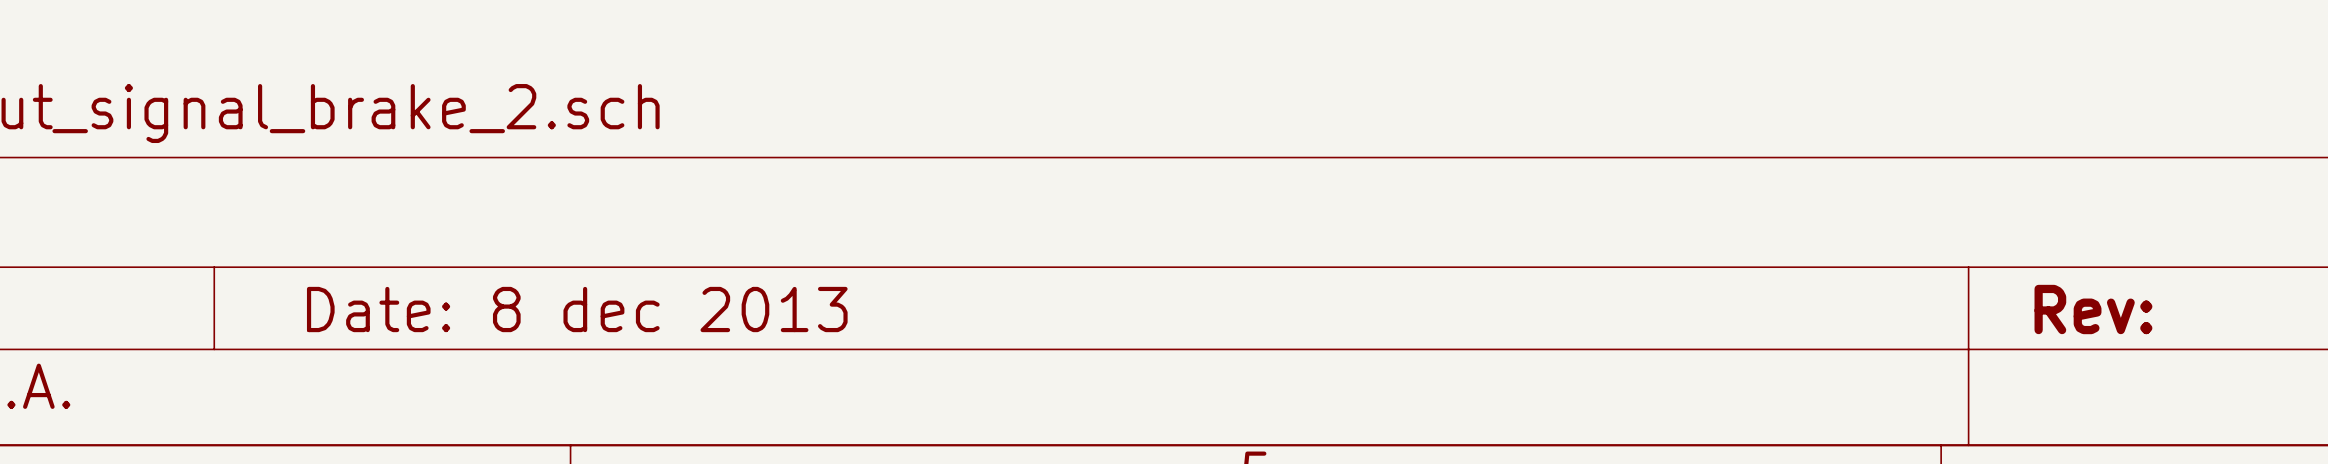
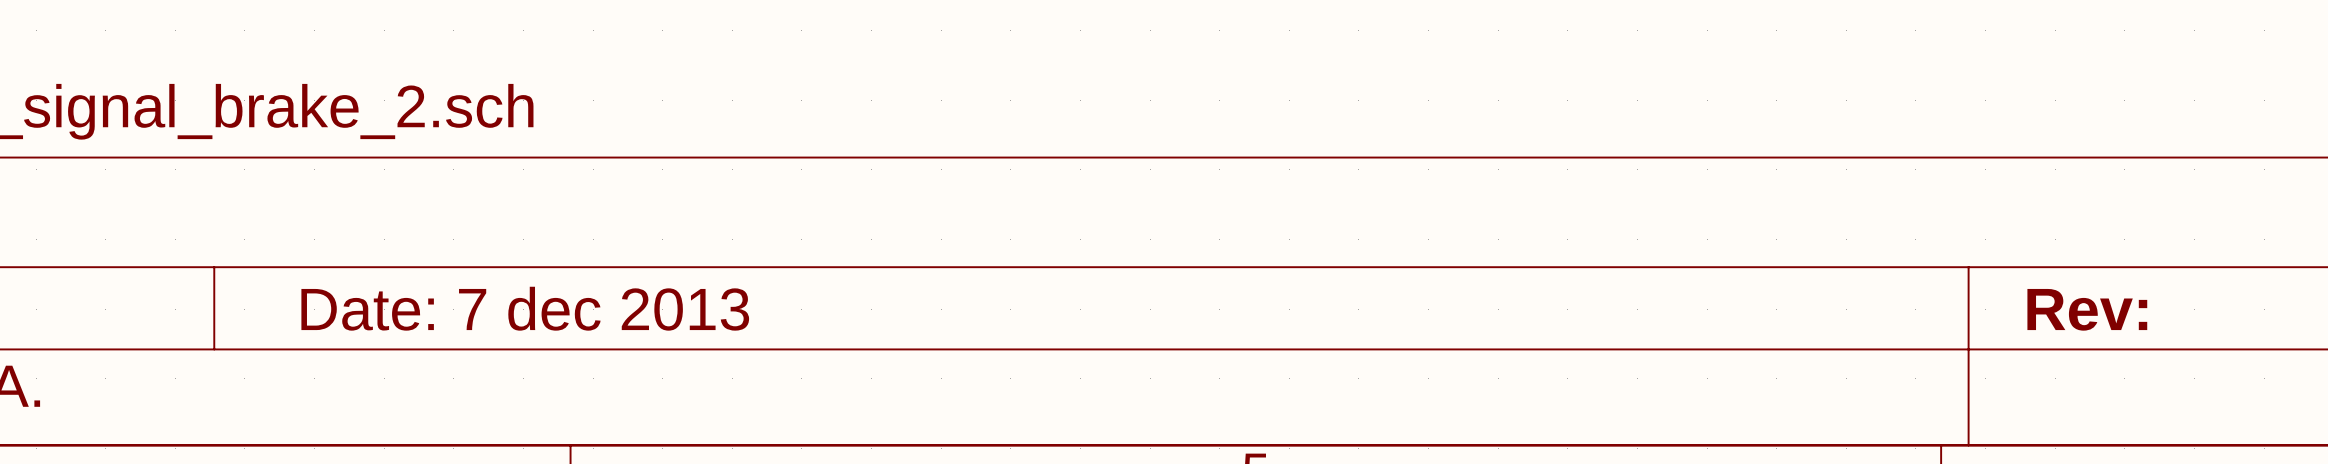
title block: Date: 8 dec 2013 (577, 309) -> Date: 7 dec 2013 (525, 308)

